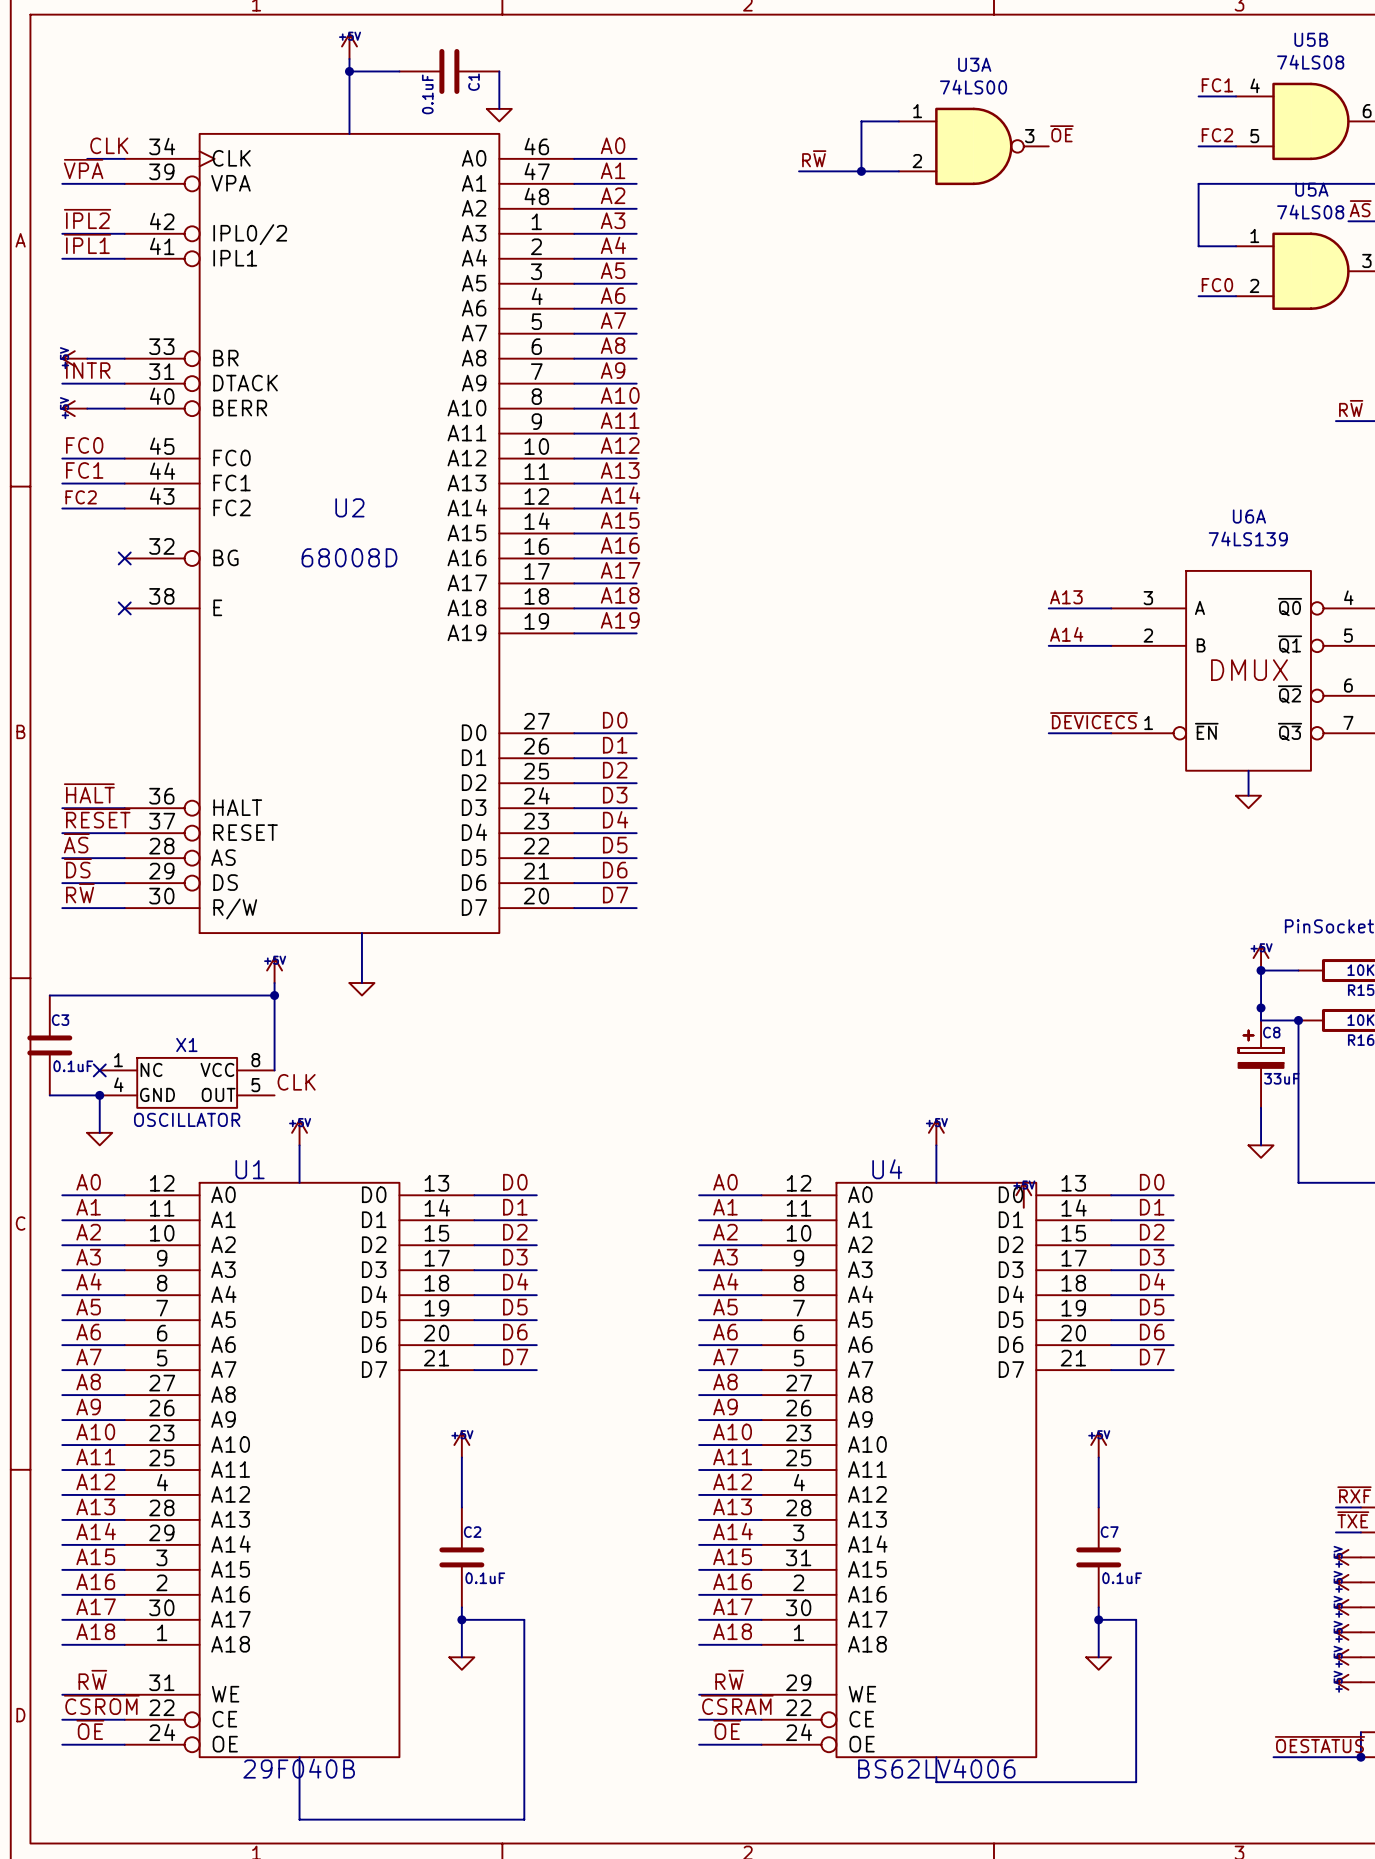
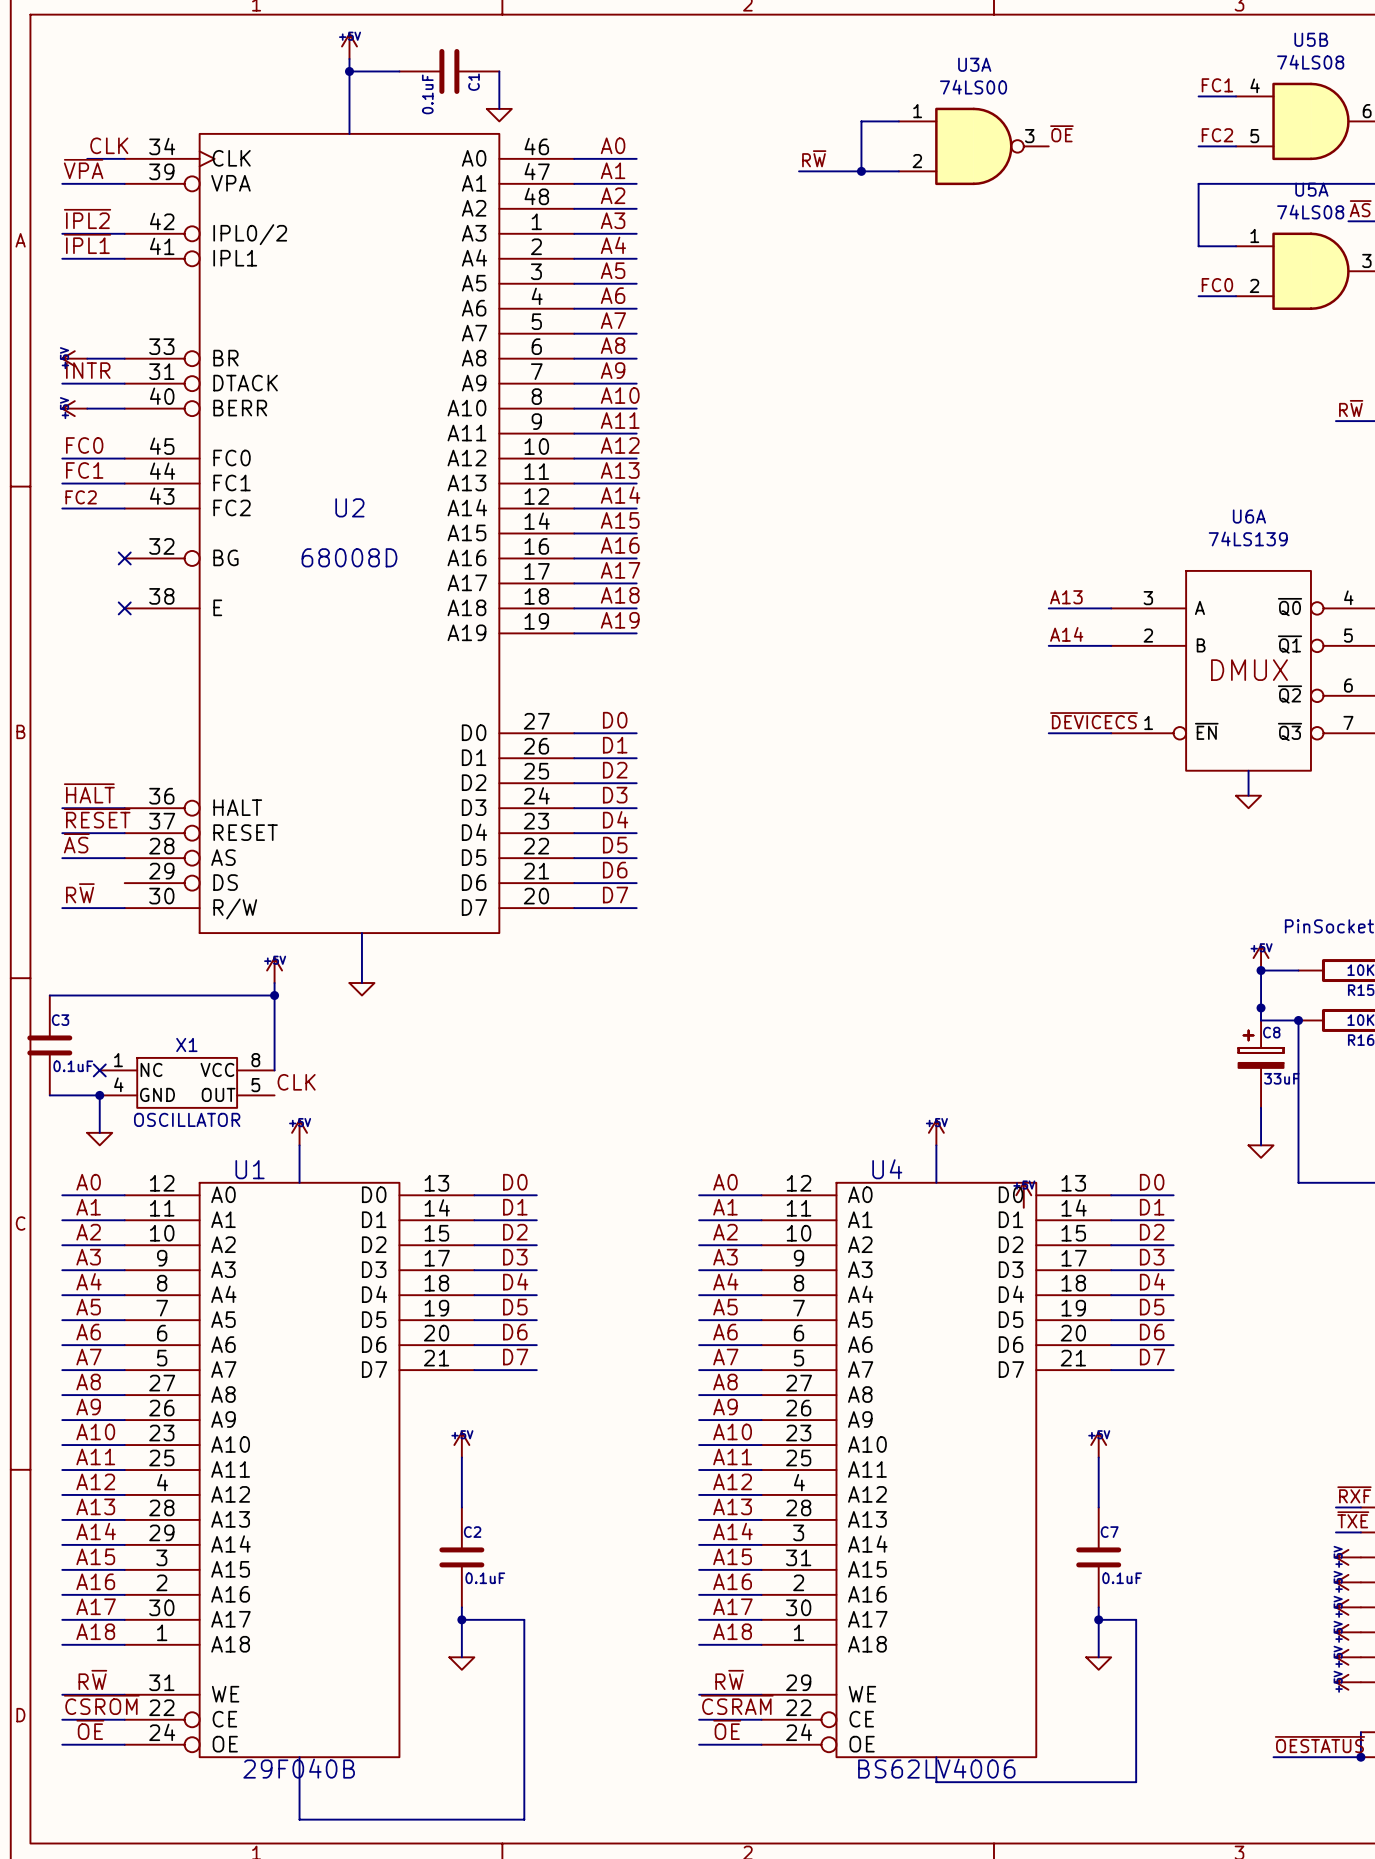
label: ~{DS} (77, 868) -> none
wire: (62, 883) (124, 883) -> none

